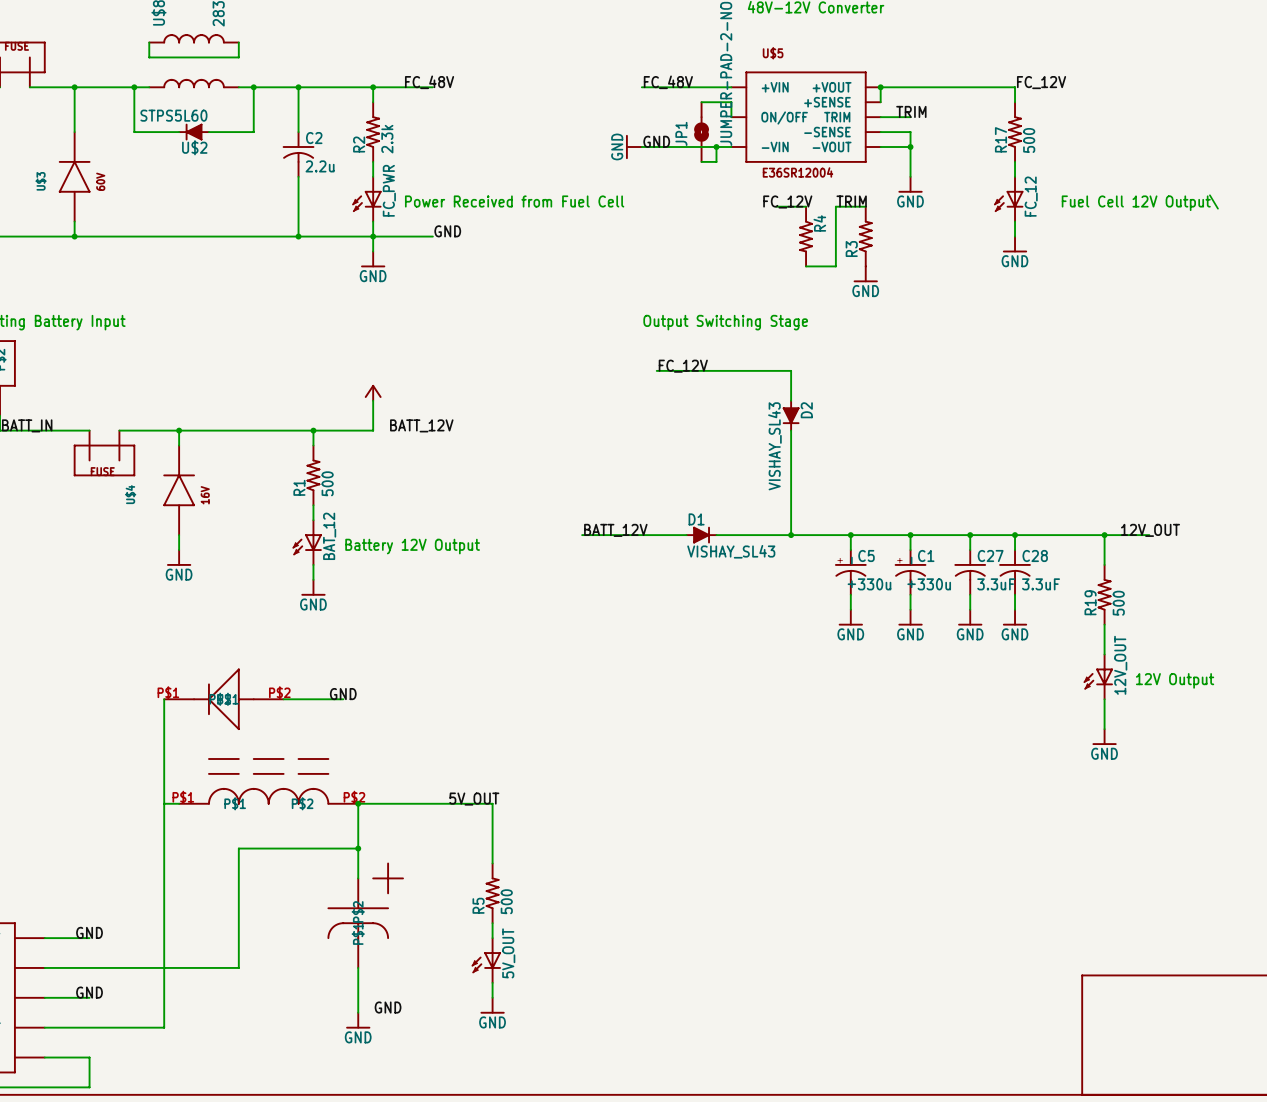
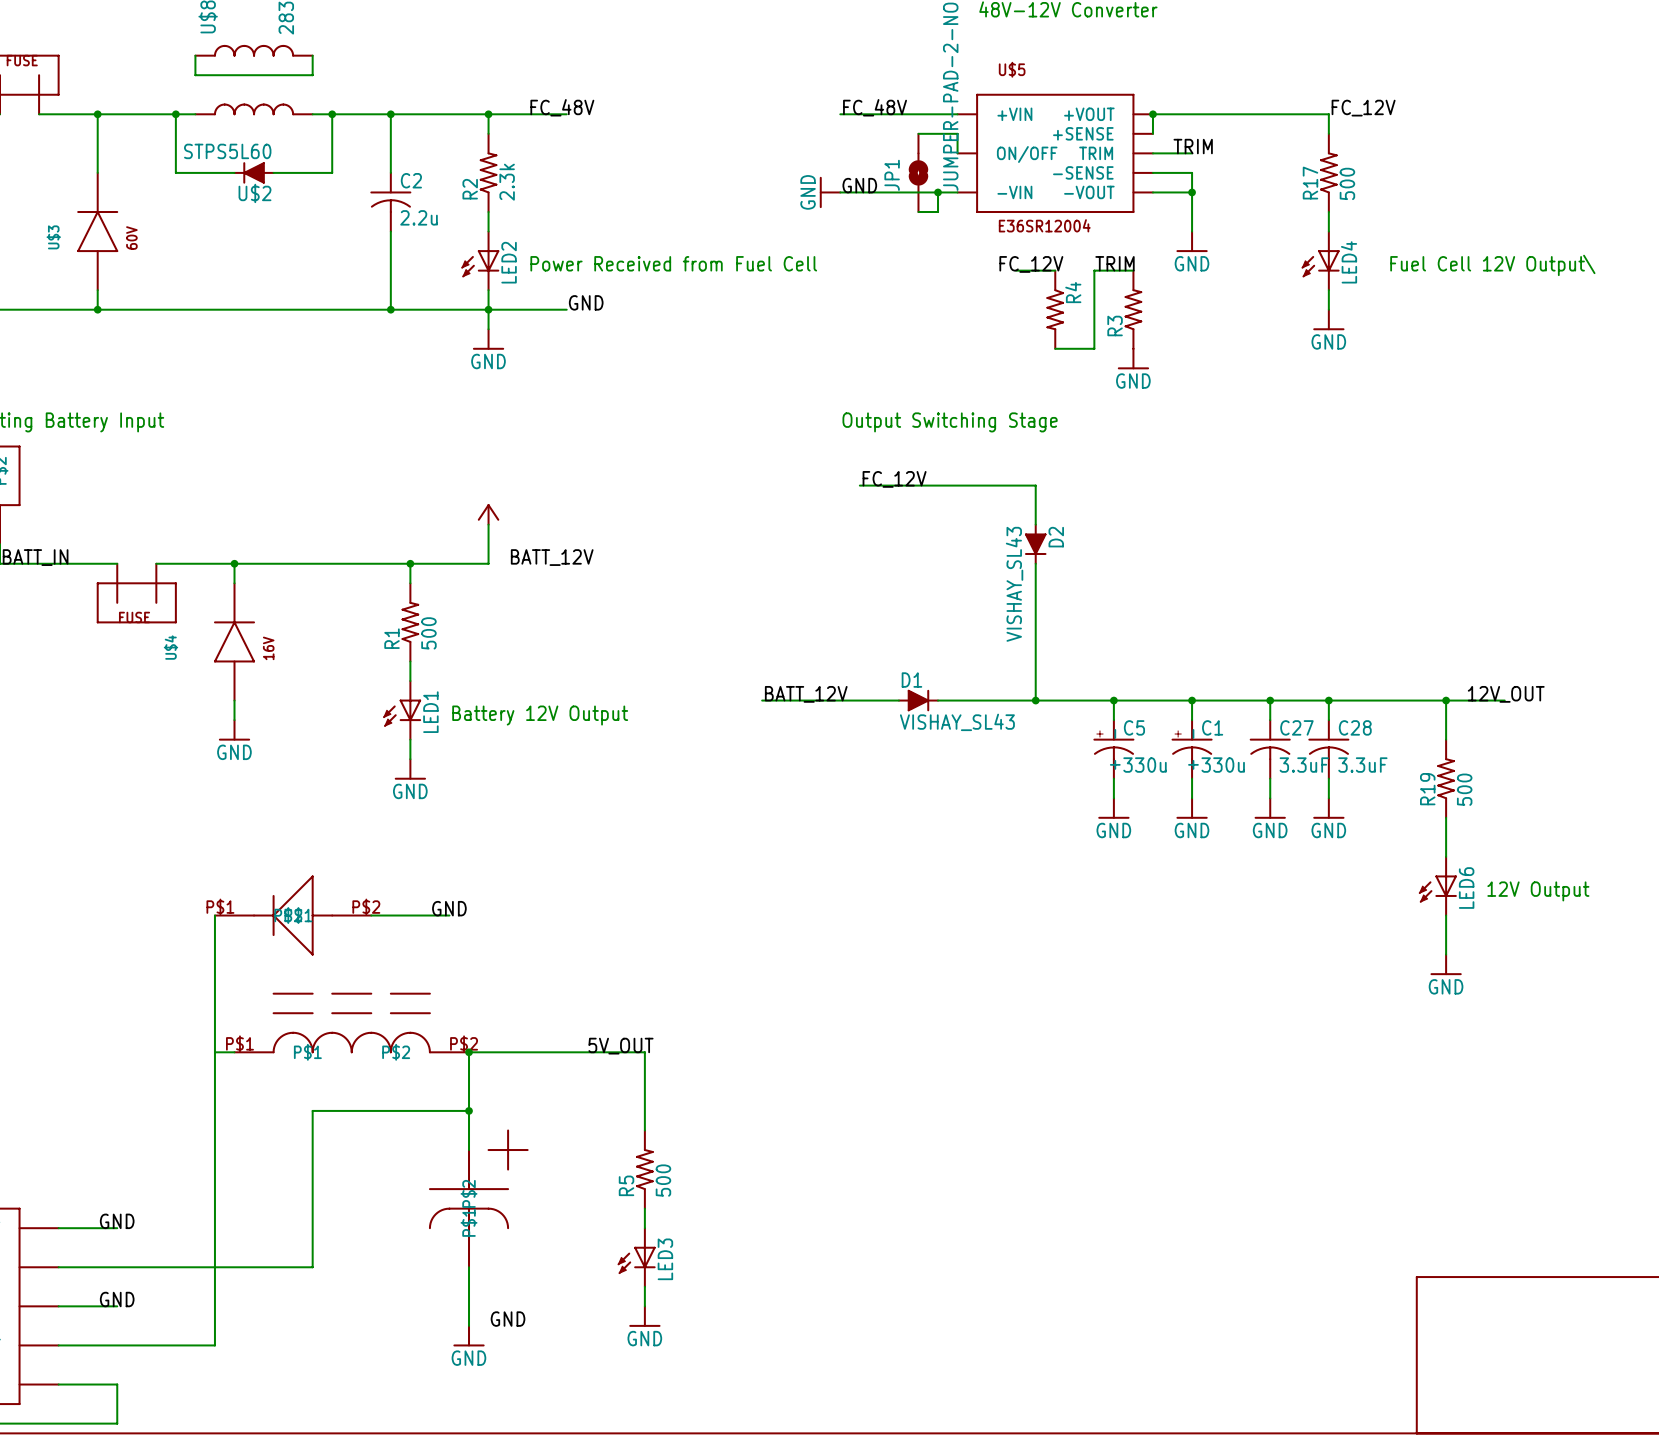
FC_PWR name: FC_PWR (389, 190) -> LED2 (509, 262)
FC_12 name: FC_12 (1031, 196) -> LED4 (1349, 262)
BAT_12 name: BAT_12 (329, 536) -> LED1 (430, 712)
12V_OUT name: 12V_OUT (1120, 665) -> LED6 (1466, 888)
5V_OUT name: 5V_OUT (508, 953) -> LED3 (665, 1259)

